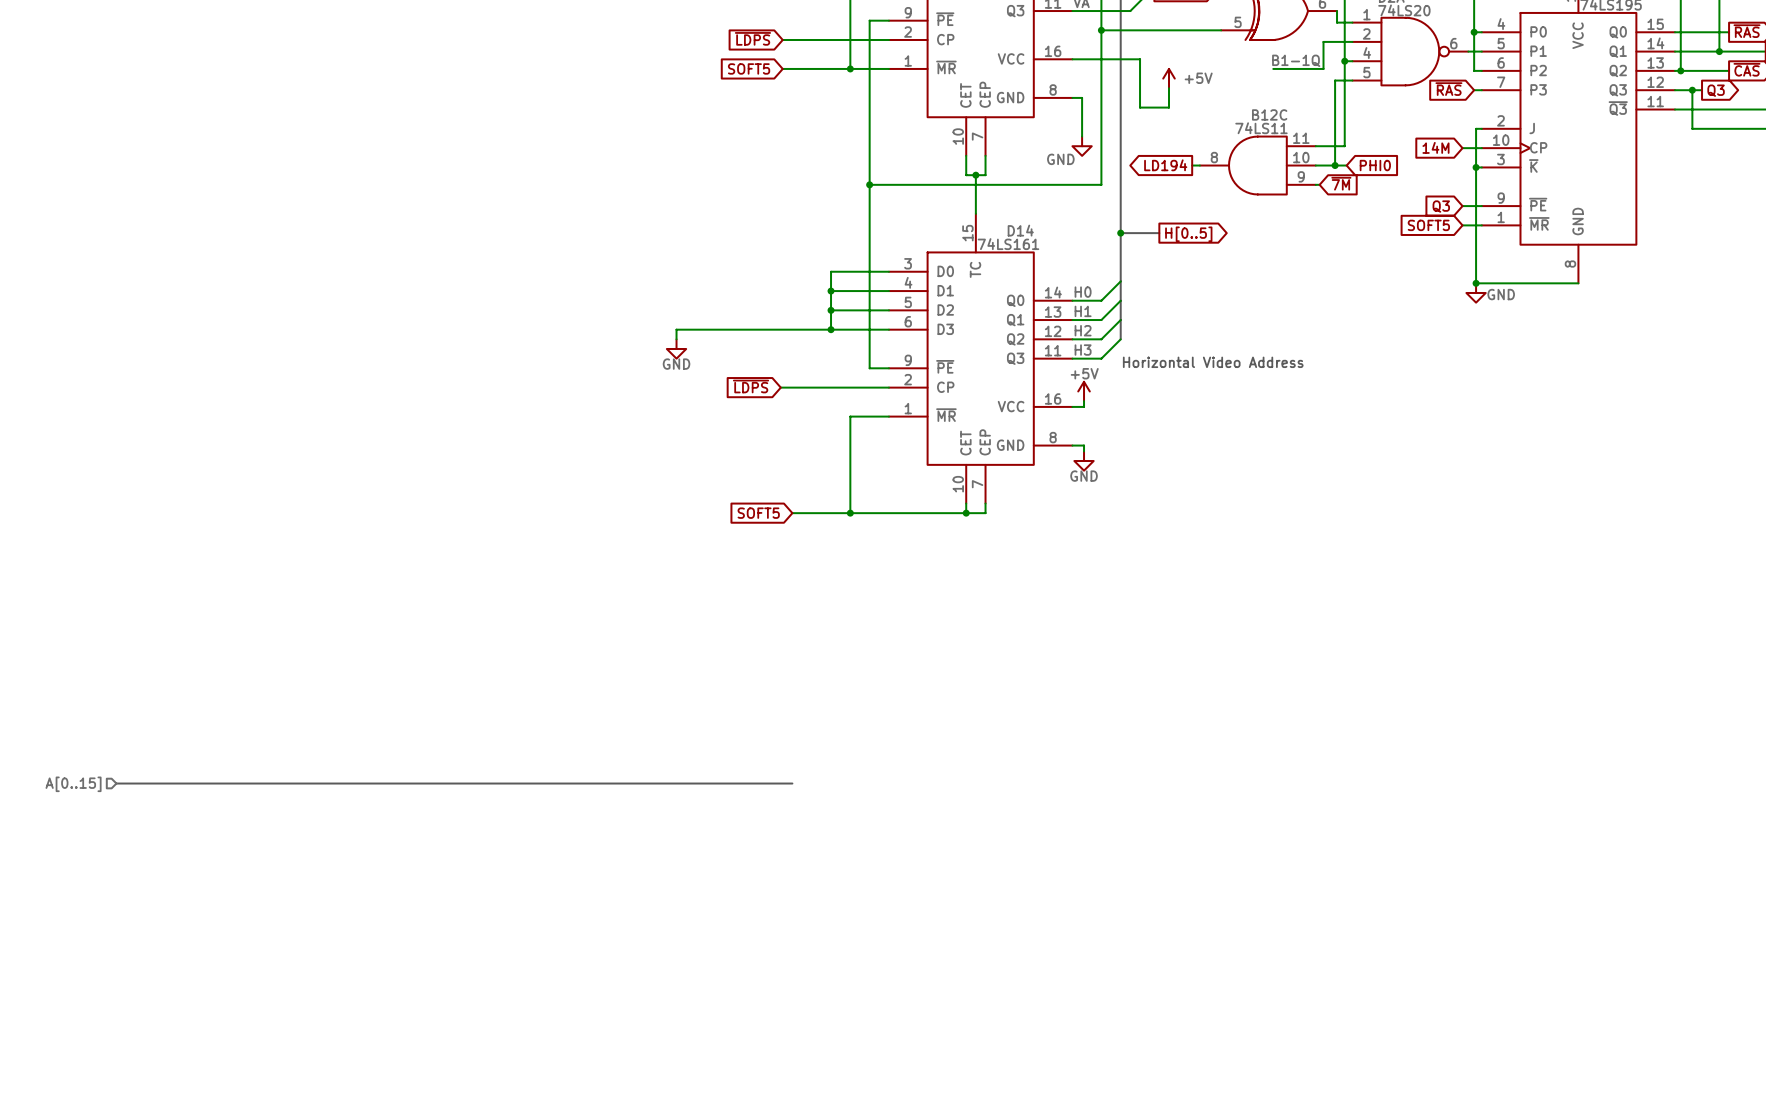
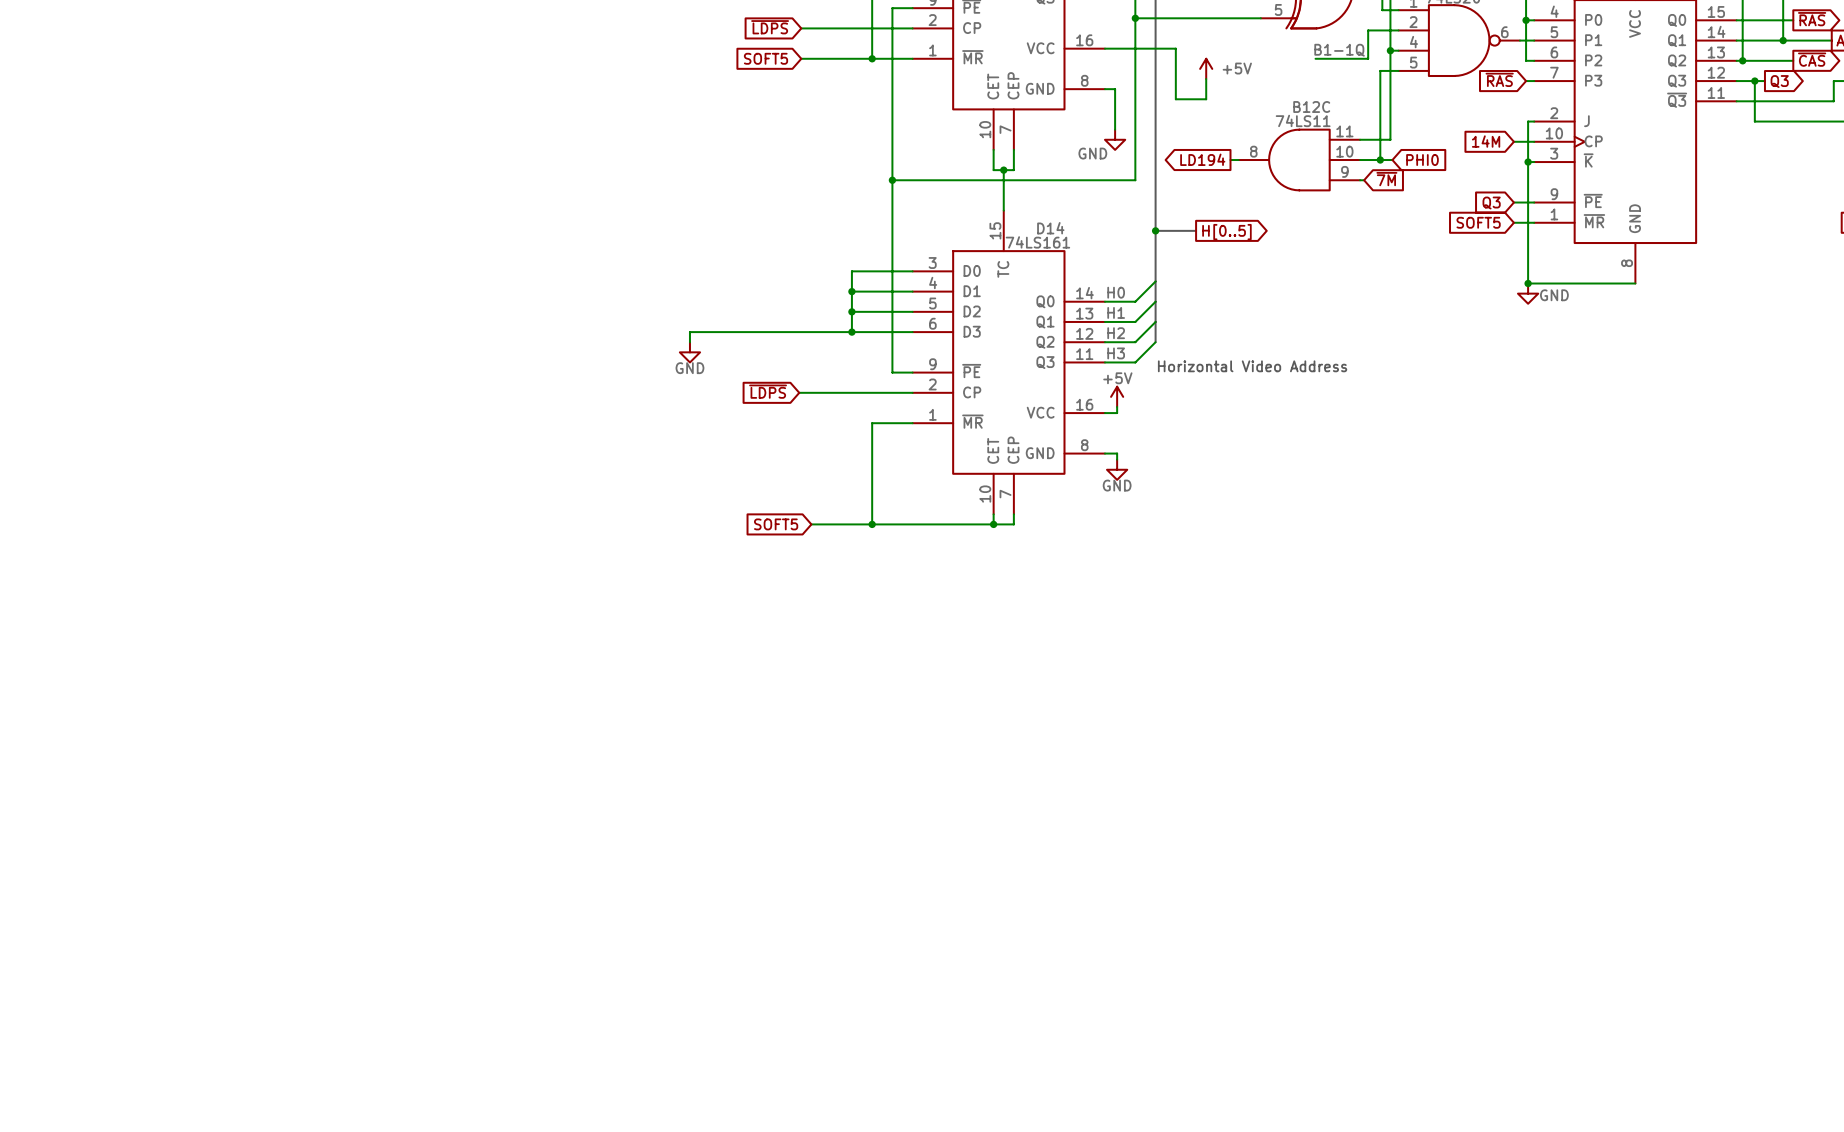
bus: (116, 783) (792, 783) -> none
hierarchical label: A[0..15] (73, 784) -> none

